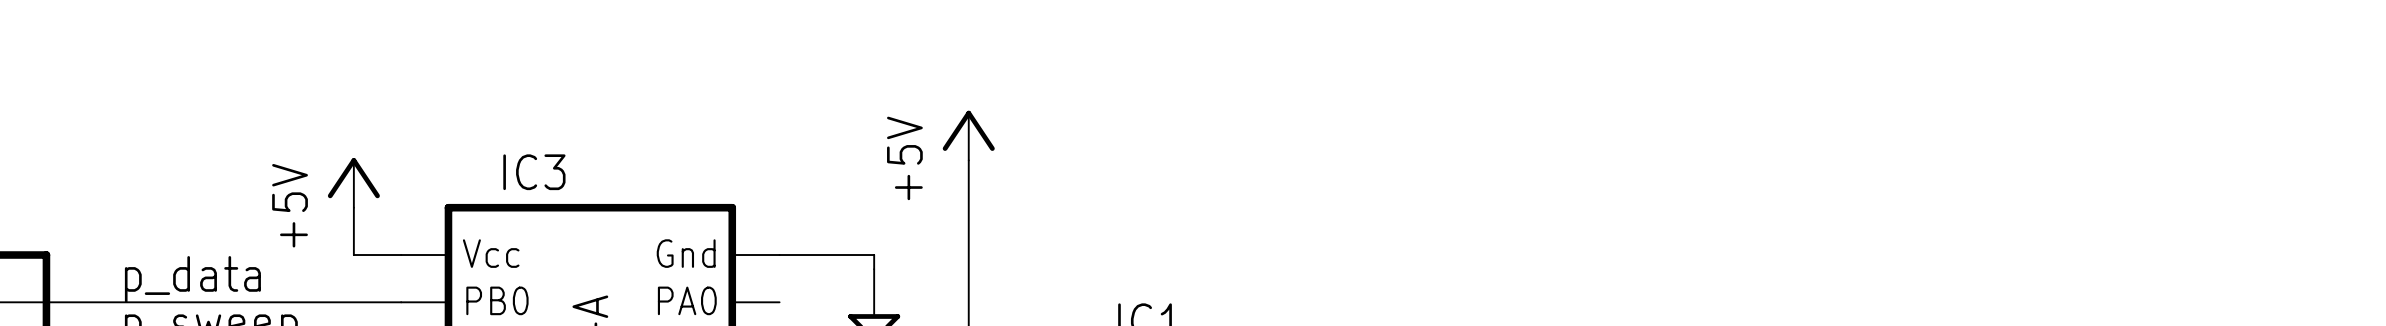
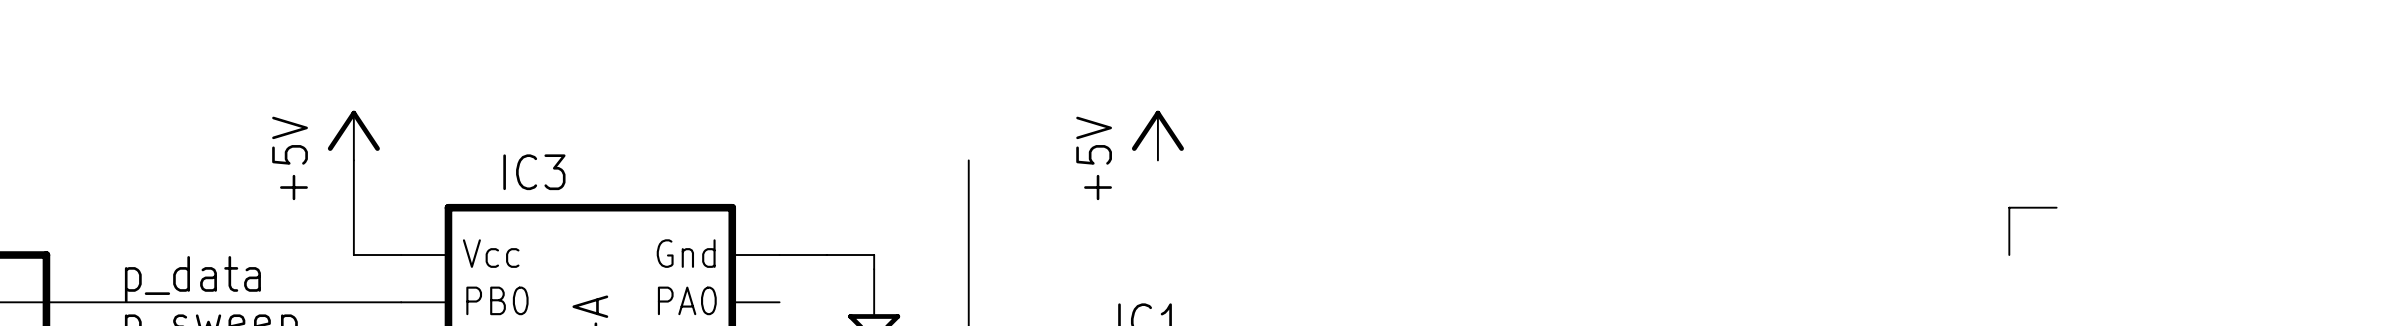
power symbol position: +5V (968, 135) -> +5V (1157, 135)
power symbol position: +5V (353, 182) -> +5V (353, 135)
wire: none -> (2056, 207) (2009, 207) (2009, 255)

